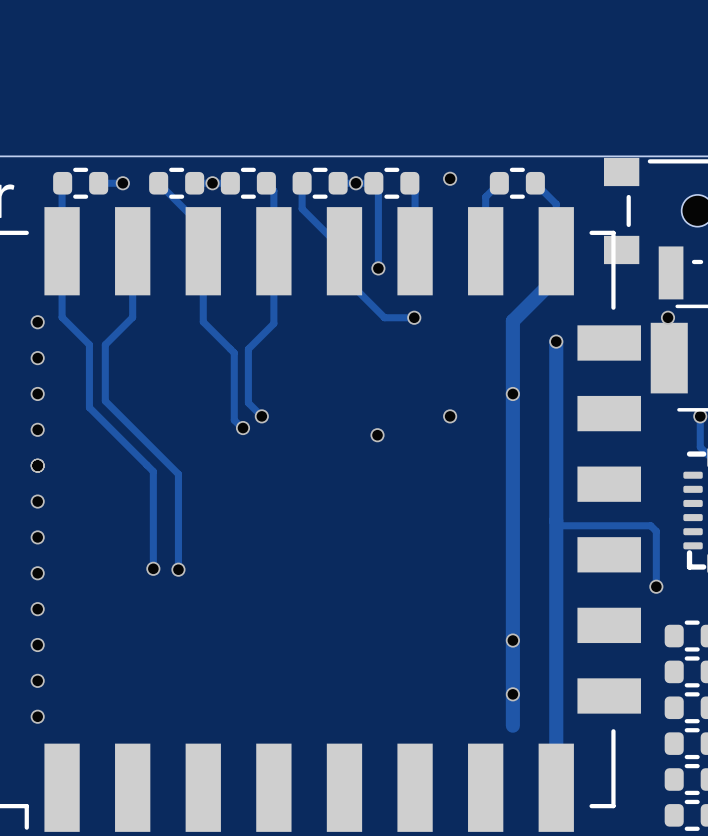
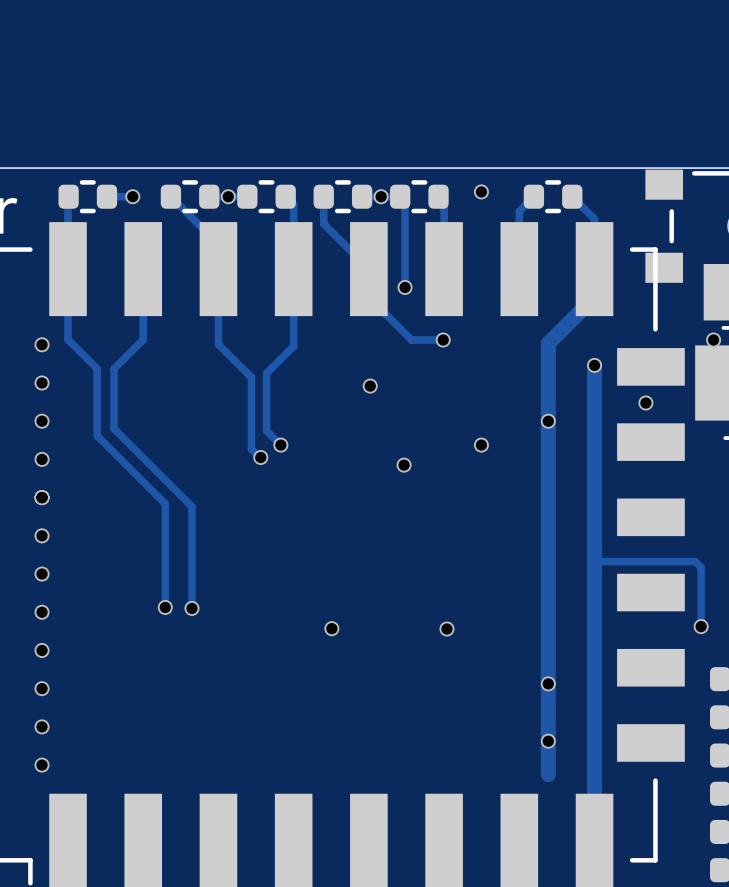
via: none -> (370, 386)
via: none -> (645, 402)
via: none -> (331, 628)
via: none -> (446, 629)

